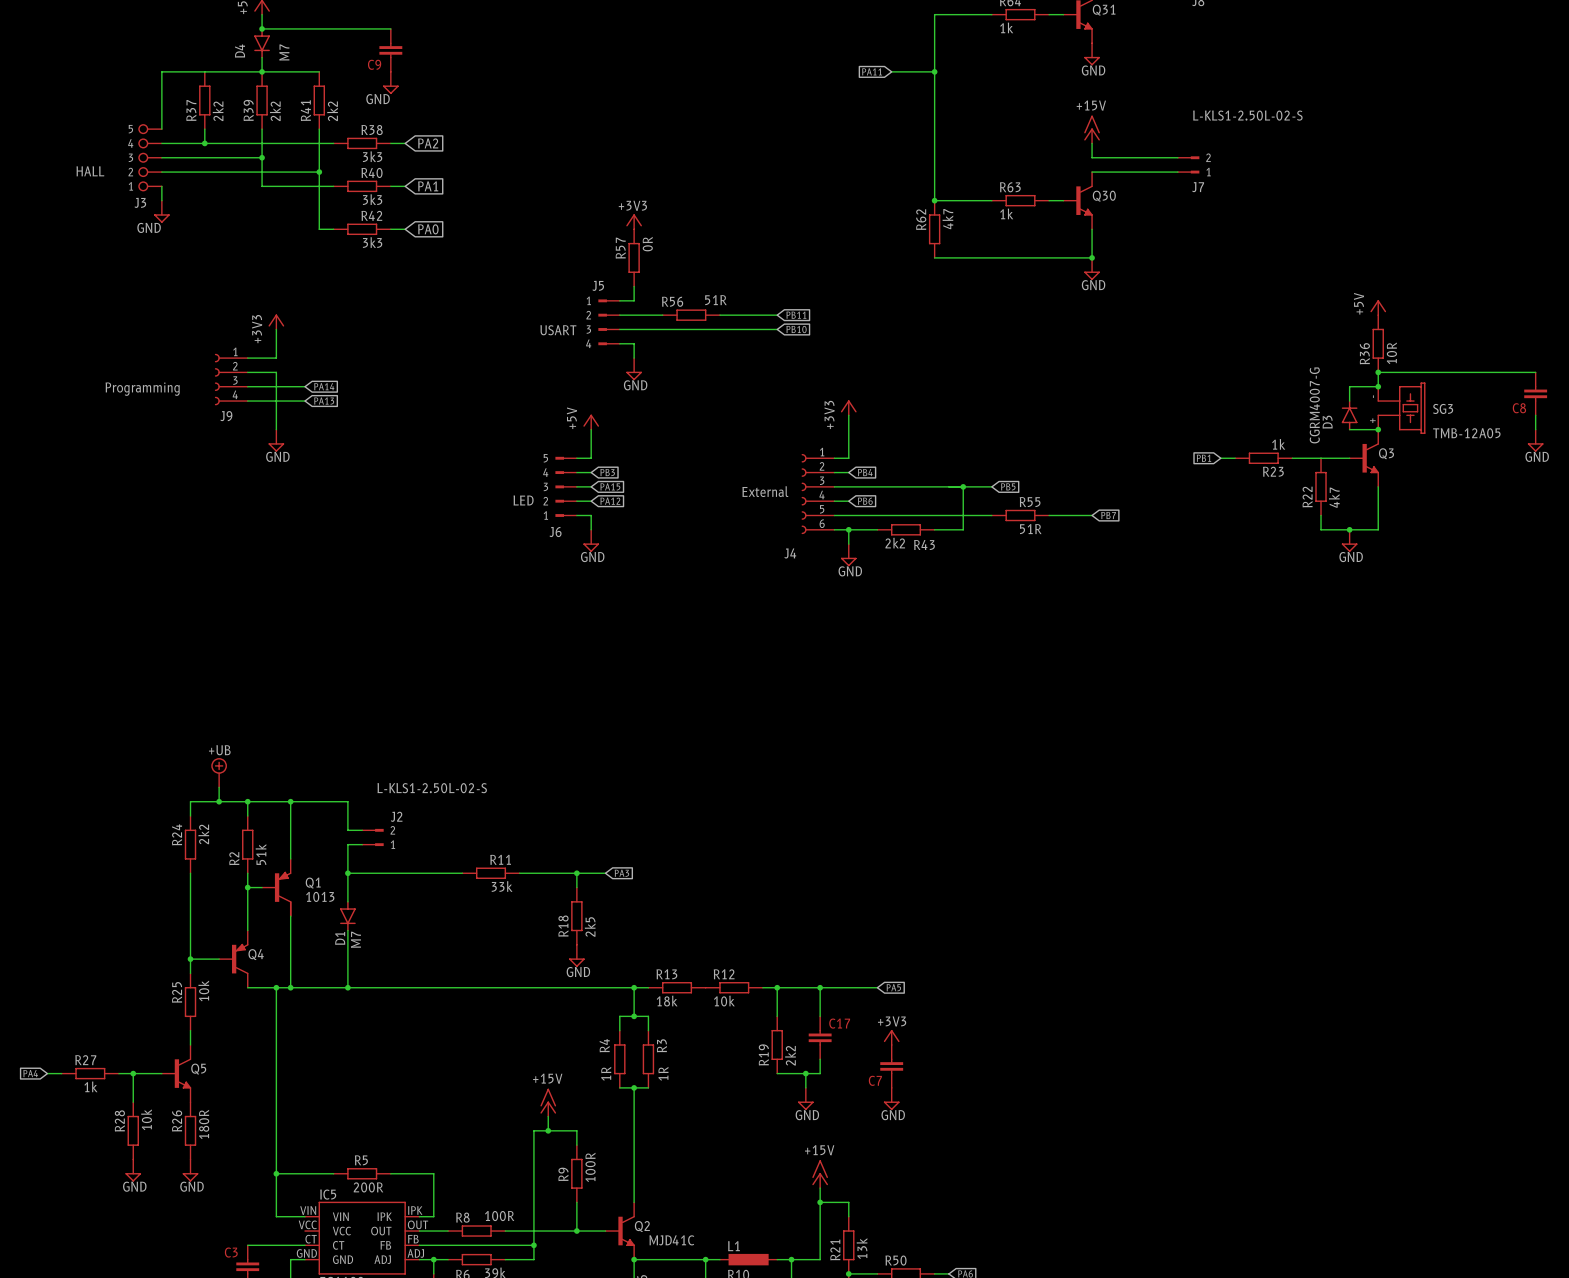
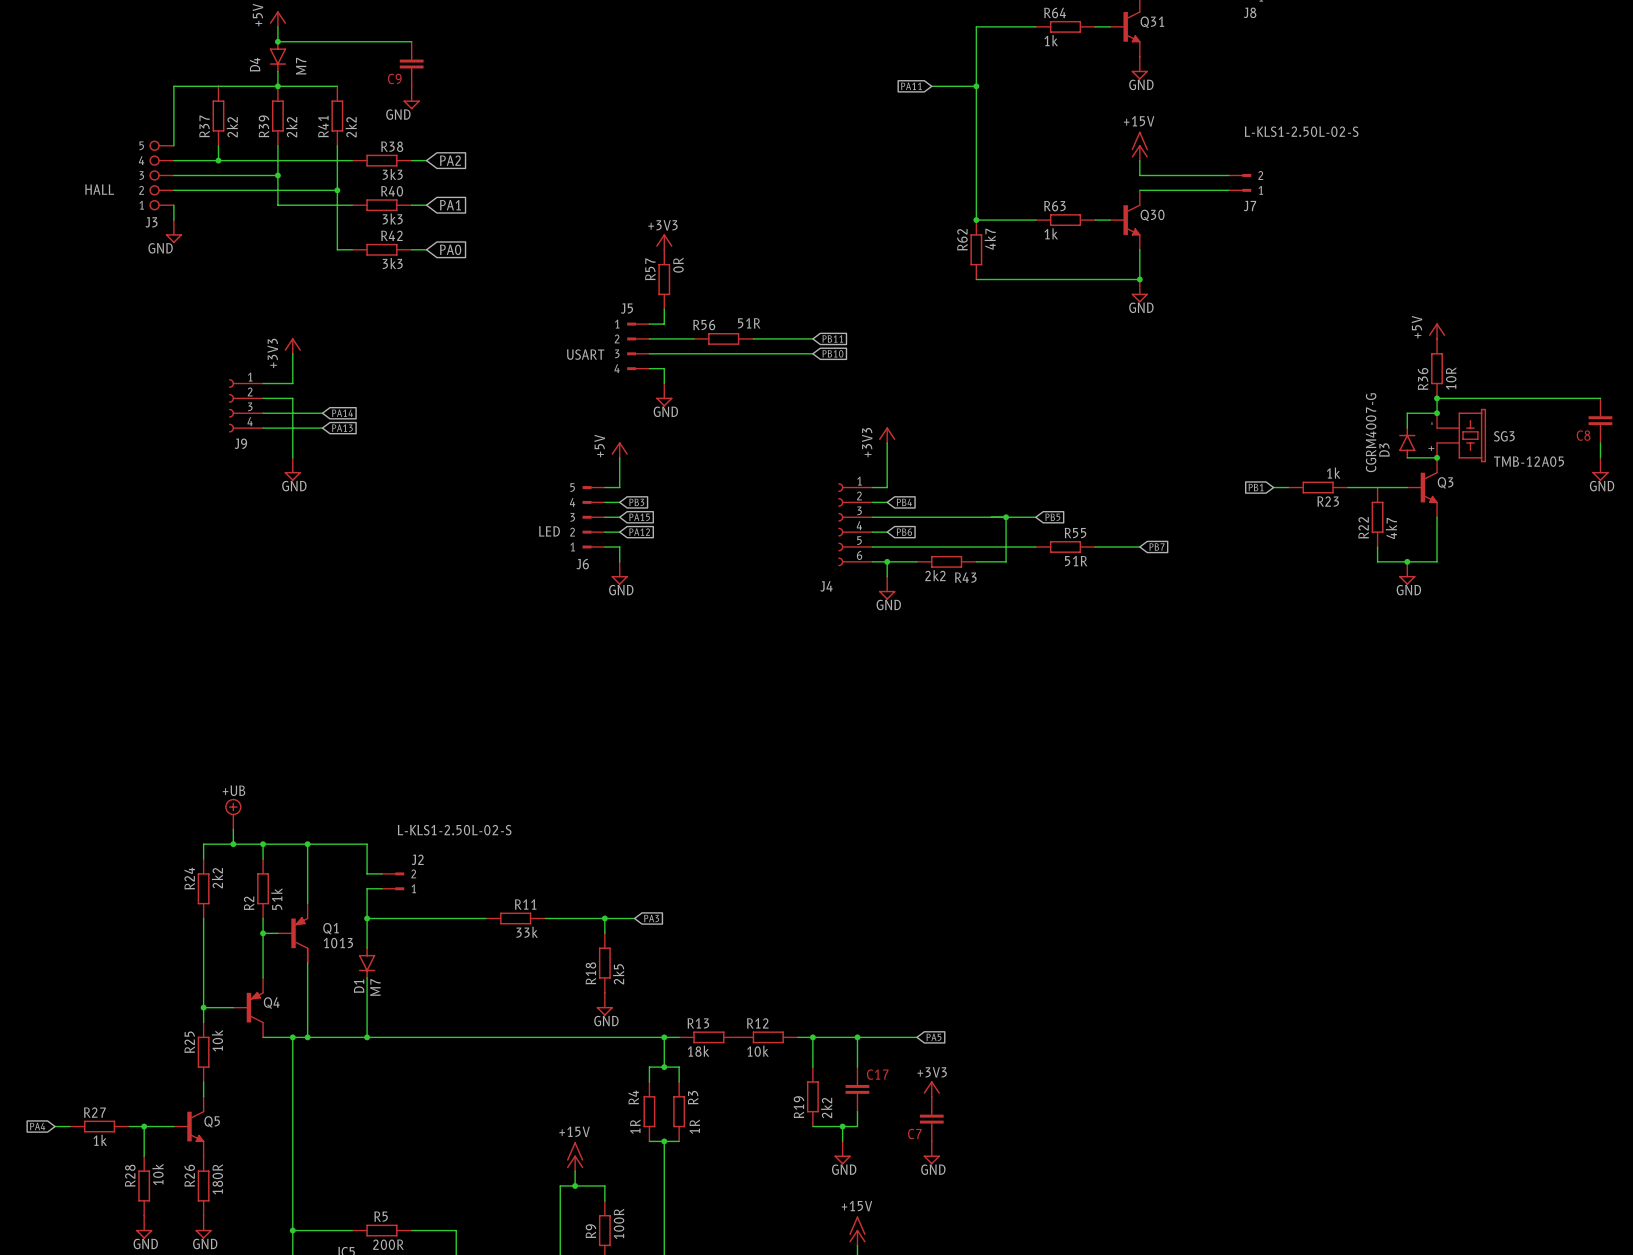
J9 value: Programming (142, 389) -> none
J4 value: External (765, 491) -> none

